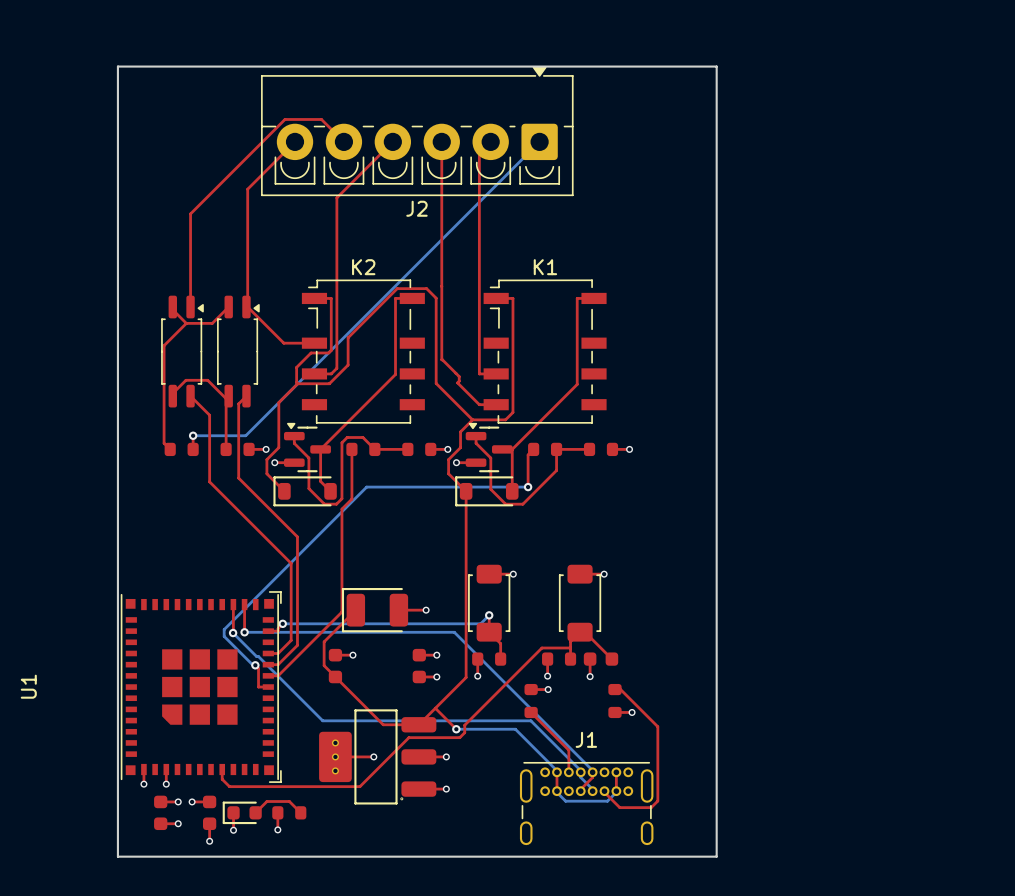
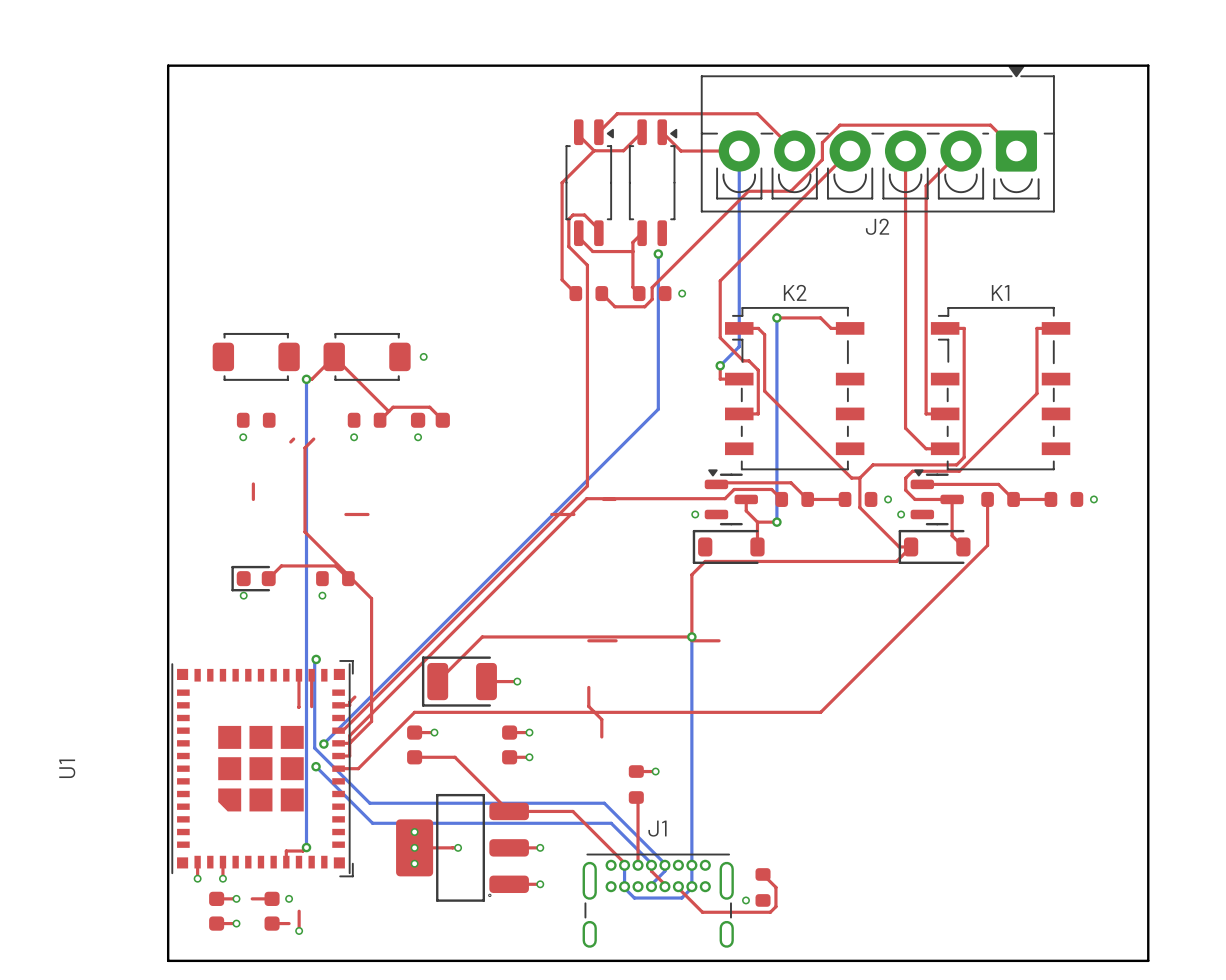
board edge: (716, 66) (716, 856) -> (846, 65) (1148, 65) (1148, 960) (846, 960)
top track: none -> (578, 132) (578, 135) (594, 150)
top track: none -> (598, 132) (617, 113) (757, 113) (794, 151)
top track: none -> (642, 132) (623, 150) (594, 150)
top track: none -> (662, 132) (681, 151) (739, 151)
J2 position: (417, 131) -> (877, 139)
top track: (295, 141) (247, 189) (247, 307) -> none
top track: (343, 141) (321, 119) (284, 119) (190, 213) (190, 307) -> none
top track: (392, 141) (336, 197) (336, 368) (331, 373) (314, 373) -> none
top track: (441, 141) (441, 359) (459, 376) (457, 382) (479, 404) (496, 404) -> none
top track: (490, 141) (479, 153) (479, 373) (496, 373) -> none
top track: none -> (594, 150) (562, 182) (562, 279) (575, 293)
bottom track: (539, 141) (245, 435) (193, 435) -> none
bottom track: none -> (739, 151) (739, 346) (720, 365)
top track: none -> (850, 151) (720, 280) (720, 337) (743, 360) (748, 360) (758, 370) (758, 413) (739, 413)
top track: none -> (905, 151) (905, 428) (926, 448) (945, 448)
top track: none -> (960, 151) (926, 185) (926, 413) (945, 413)
top track: none -> (1016, 151) (990, 125) (839, 125) (822, 142) (822, 159) (790, 191) (748, 191) (652, 287) (652, 299) (644, 306) (615, 306) (601, 293)
part: none -> (589, 182)
part: none -> (653, 182)
top track: none -> (578, 233) (578, 237) (592, 251) (632, 251)
top track: none -> (642, 233) (632, 242) (632, 287) (639, 293)
bottom track: none -> (658, 254) (658, 409) (324, 743)
via: none -> (658, 254)
part: none -> (588, 293)
part: none -> (652, 293)
via: none -> (682, 293)
top track: none -> (776, 317) (820, 317) (831, 328) (850, 328)
bottom track: none -> (776, 317) (776, 522)
via: none -> (776, 317)
top track: (314, 298) (331, 298) (331, 350) (328, 352) (311, 352) (296, 367) (297, 383) -> none
top track: (412, 298) (395, 298) (395, 374) (320, 449) (320, 481) (330, 491) -> none
top track: (496, 298) (512, 298) (512, 412) (505, 419) (472, 419) -> none
top track: (594, 298) (577, 298) (577, 384) (512, 449) (512, 491) -> none
top track: none -> (739, 328) (758, 328) (764, 334) (764, 391) (851, 478) (859, 478)
top track: none -> (945, 328) (964, 328) (964, 457) (956, 464) (873, 464) (859, 478)
top track: none -> (1056, 328) (1036, 328) (1036, 393) (959, 471) (912, 471) (905, 478) (905, 490) (914, 499) (952, 499) (952, 535) (963, 546)
top track: (172, 307) (172, 309) (186, 323) -> none
top track: (228, 307) (212, 323) (186, 323) -> none
top track: (247, 307) (283, 343) (314, 343) -> none
top track: (186, 323) (164, 345) (164, 443) (170, 449) -> none
part: none -> (256, 356)
part: none -> (367, 356)
via: none -> (423, 356)
top track: none -> (720, 365) (720, 379) (739, 379)
via: none -> (720, 365)
top track: none -> (306, 379) (311, 379) (334, 356) (388, 411)
bottom track: none -> (306, 379) (306, 847)
via: none -> (306, 379)
part: (182, 351) -> none
part: (238, 351) -> none
K2 position: (363, 351) -> (794, 388)
K1 position: (545, 351) -> (1000, 388)
part: none -> (256, 420)
part: none -> (367, 420)
top track: none -> (380, 420) (393, 407) (429, 407) (442, 420)
part: none -> (430, 420)
top track: (297, 383) (329, 383) (348, 365) (348, 337) (397, 288) (426, 288) (436, 298) (436, 383) (472, 419) -> none
top track: (297, 383) (278, 402) (278, 447) (266, 459) (266, 473) (284, 491) -> none
via: none -> (243, 437)
via: none -> (354, 437)
via: none -> (418, 437)
top track: (172, 396) (172, 393) (185, 380) (207, 380) (226, 398) (226, 449) -> none
top track: (190, 396) (209, 415) (209, 481) (291, 563) (291, 640) (278, 653) (272, 653) -> (598, 233) (598, 229) (584, 215) (573, 215) (568, 219) (568, 246) (587, 265) (587, 486) (342, 730)
top track: (472, 419) (460, 431) (460, 447) (448, 459) (448, 473) (466, 491) (466, 677) (418, 724) (383, 724) (324, 665) (324, 641) (355, 610) -> (859, 478) (859, 507) (899, 546) (911, 546) (896, 561) (705, 561) (691, 574) (691, 636) (482, 636) (437, 681)
via: (193, 435) -> none
top track: (294, 436) (294, 443) (308, 457) (308, 488) (324, 504) (336, 504) (341, 498) (341, 442) (347, 437) (362, 437) (374, 449) (407, 449) -> none
top track: (476, 436) (476, 443) (490, 458) (490, 489) (505, 504) (522, 504) (556, 470) (556, 449) (589, 449) -> none
top track: none -> (716, 484) (718, 482) (791, 482) (807, 499) (845, 499)
top track: none -> (922, 484) (998, 484) (1013, 499) (1050, 499)
part: (307, 447) -> none
part position: (489, 447) -> (731, 497)
part: none -> (937, 497)
part: (181, 449) -> none
part: (237, 449) -> none
top track: (249, 449) (266, 449) -> none
via: (266, 449) -> none
top track: (351, 449) (351, 499) (341, 509) (341, 612) (278, 675) -> (781, 499) (771, 489) (734, 489) (724, 498) (586, 498) (349, 735) (349, 756)
part: (363, 449) -> none
part: (419, 449) -> none
top track: (430, 449) (447, 449) -> none
via: (447, 449) -> none
top track: (533, 449) (528, 454) (528, 487) -> none
part: (545, 449) -> none
part: (601, 449) -> none
top track: (612, 449) (629, 449) -> (757, 522) (776, 522)
top track: none -> (746, 499) (746, 510) (757, 522)
via position: (629, 449) -> (695, 514)
part: none -> (794, 499)
part: none -> (858, 499)
via: none -> (888, 499)
part: none -> (1000, 499)
part: none -> (1063, 499)
via: none -> (1093, 499)
via: (274, 462) -> none
via: (456, 462) -> none
via: none -> (901, 514)
top track: none -> (757, 522) (757, 546)
via: none -> (776, 522)
bottom track: (528, 487) (366, 487) (224, 629) (224, 636) (253, 665) (255, 665) -> none
via: (528, 487) -> none
part: (305, 491) -> none
part position: (486, 491) -> (728, 546)
part: none -> (934, 546)
top track: none -> (268, 578) (281, 565) (335, 565) (348, 578)
part: none -> (335, 578)
via: none -> (243, 595)
via: none -> (322, 595)
via: none -> (691, 636)
via: (513, 574) -> none
via: (604, 574) -> none
bottom track: none -> (316, 659) (314, 748) (369, 803) (604, 803) (664, 863) (664, 871) (651, 886)
via: none -> (316, 659)
part: (489, 603) -> none
part: (580, 603) -> none
bottom track: (489, 615) (480, 623) (282, 623) -> none
via: (489, 615) -> none
via: (282, 623) -> none
bottom track: (244, 632) (454, 632) (592, 772) -> none
via: (244, 632) -> none
bottom track: (233, 633) (322, 720) (530, 720) (580, 770) (580, 777) (592, 791) -> none
via: (233, 633) -> none
top track: (570, 648) (541, 648) (464, 725) (464, 732) (459, 737) (408, 737) (359, 786) (229, 786) (222, 779) (222, 769) -> (306, 847) (303, 851) (286, 851) (286, 862)
top track: (477, 659) (477, 676) -> none
part: (489, 659) -> none
top track: (547, 659) (547, 676) -> none
part: (559, 659) -> none
top track: (570, 659) (570, 641) (580, 632) (585, 632) (611, 659) -> none
top track: (590, 659) (590, 676) -> none
part: (601, 659) -> none
top track: (255, 665) (258, 668) (258, 687) (268, 687) -> (987, 499) (987, 545) (820, 712) (414, 712) (358, 768) (338, 768)
top track: none -> (414, 757) (454, 757) (509, 811) (572, 811) (624, 863) (624, 865)
via: (477, 676) -> none
via: (547, 676) -> none
via: (590, 676) -> none
bottom track: none -> (316, 766) (372, 823) (611, 823) (651, 865)
via: none -> (316, 766)
top track: (614, 689) (620, 689) (657, 726) (657, 801) (651, 807) (619, 807) (604, 791) -> none
part: (614, 701) -> none
top track: (435, 708) (456, 729) -> none
top track: (614, 712) (632, 712) -> none
via: (632, 712) -> none
top track: (532, 713) (568, 750) (568, 772) -> (638, 799) (638, 865)
bottom track: (456, 729) (515, 729) (556, 772) -> none
via: (456, 729) -> none
via: none -> (306, 847)
top track: none -> (651, 865) (651, 871) (664, 886)
top track: (556, 772) (556, 791) -> none
top track: (592, 772) (592, 777) (580, 791) -> none
top track: (616, 772) (616, 791) -> none
top track: none -> (763, 874) (775, 887) (775, 906) (770, 912) (702, 912) (678, 886)
bottom track: (556, 791) (565, 801) -> (624, 865) (624, 888) (634, 898) (675, 898)
bottom track: (616, 791) (607, 801) (571, 801) -> (691, 636) (691, 887) (681, 898)
part: none -> (763, 887)
via: (192, 801) -> none
via: none -> (289, 898)
J1 position: (586, 803) -> (658, 900)
via: none -> (745, 900)
part position: (242, 812) -> (253, 578)
top track: (255, 812) (266, 801) (289, 801) (300, 812) -> none
top track: (277, 812) (277, 829) -> none
part: (289, 812) -> none
top track: (209, 823) (209, 841) -> (272, 923) (289, 923)
via: (277, 829) -> none
via: (209, 841) -> none

